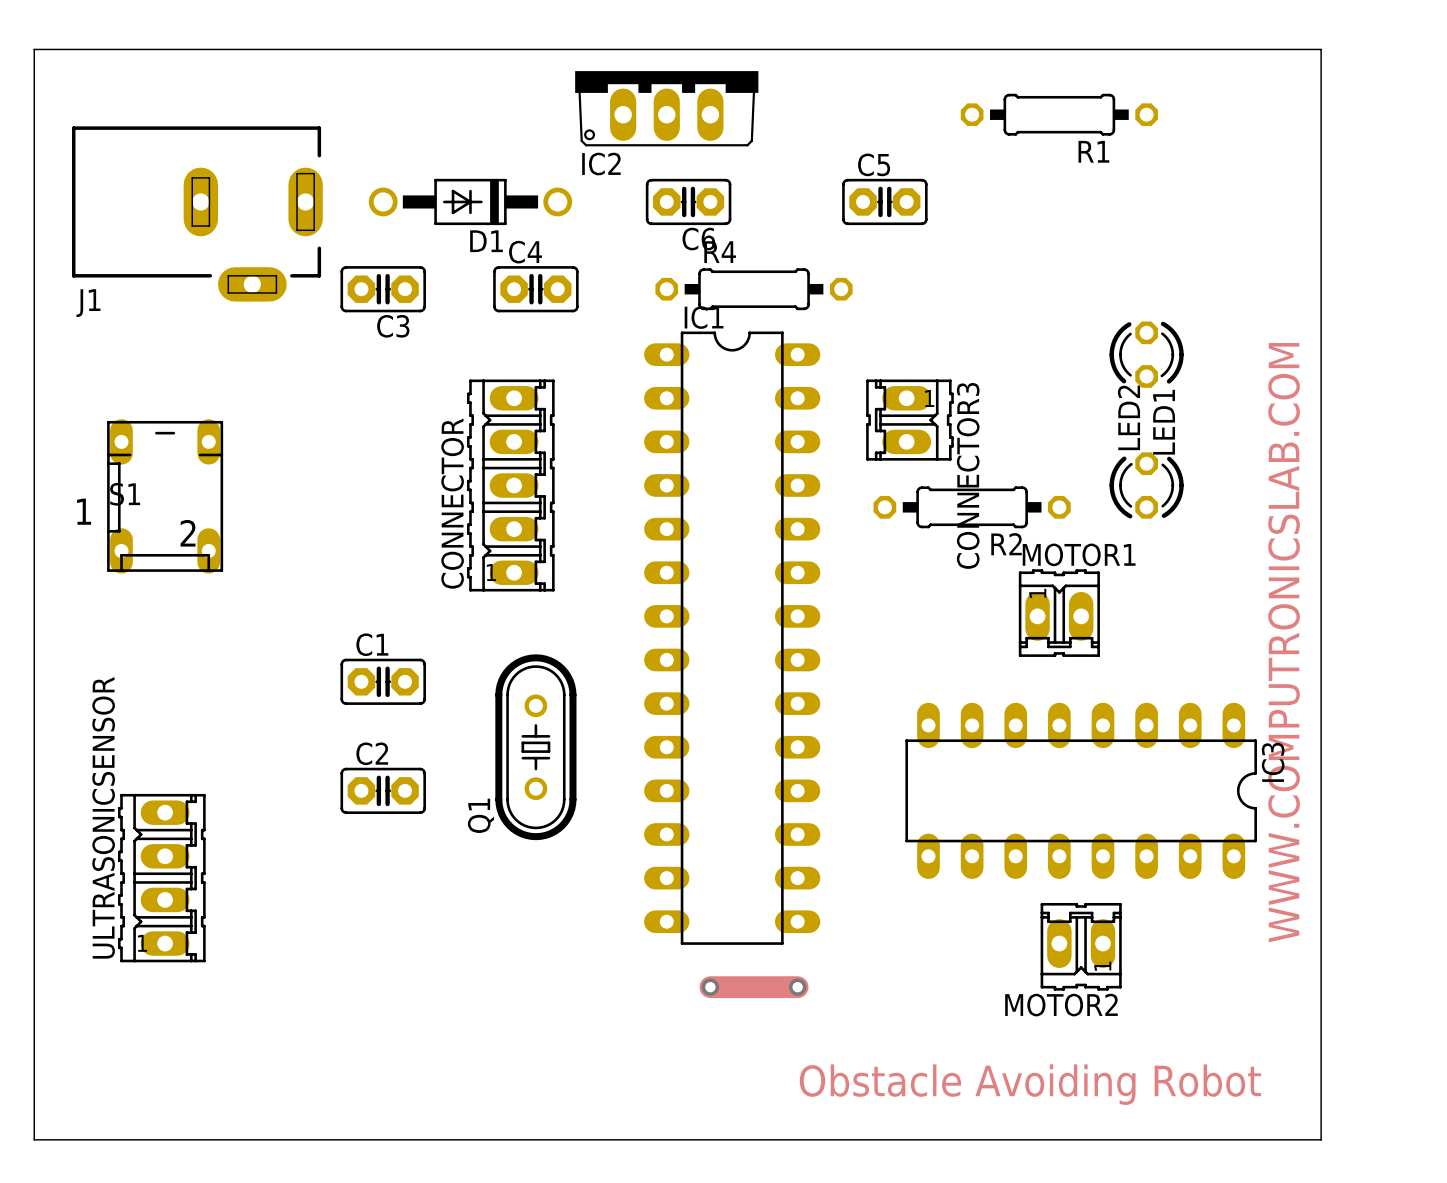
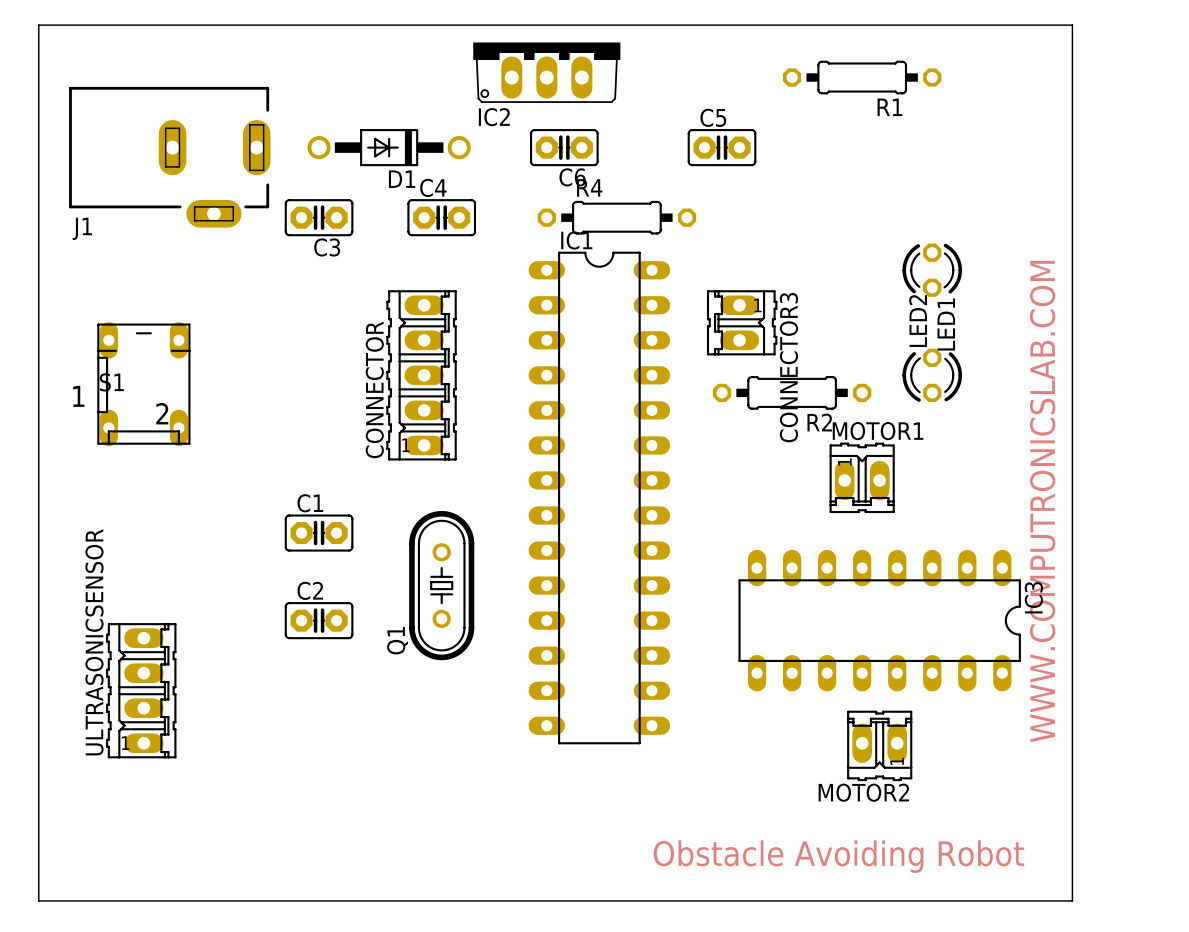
track: (710, 987) (797, 987) -> none
via: (710, 987) -> none
via: (797, 987) -> none

